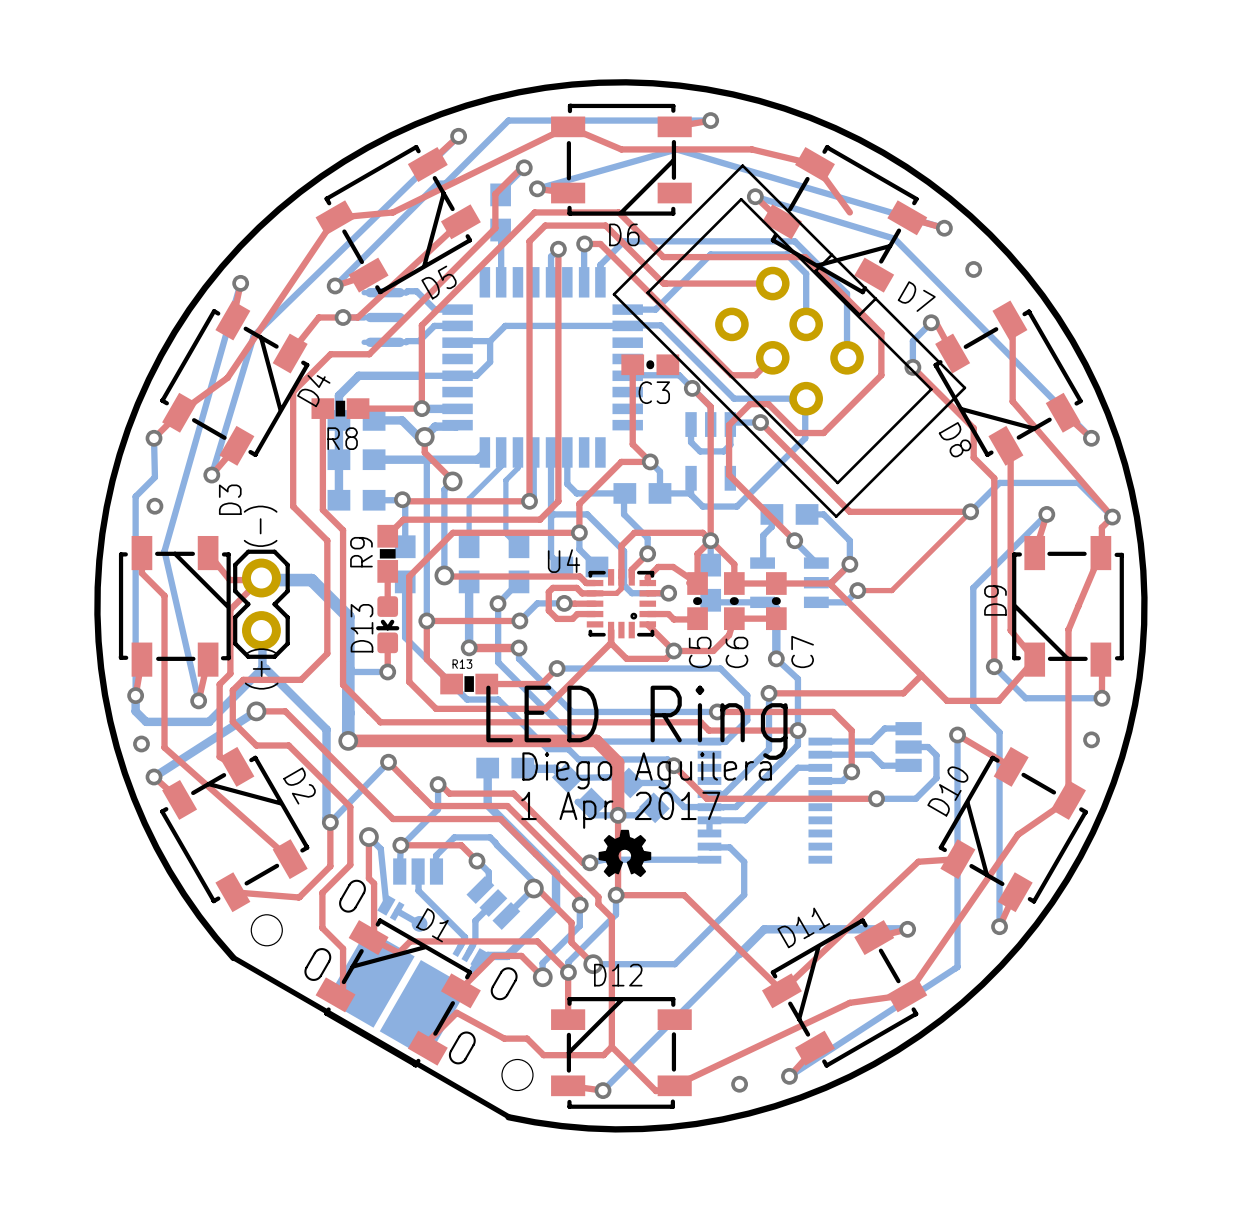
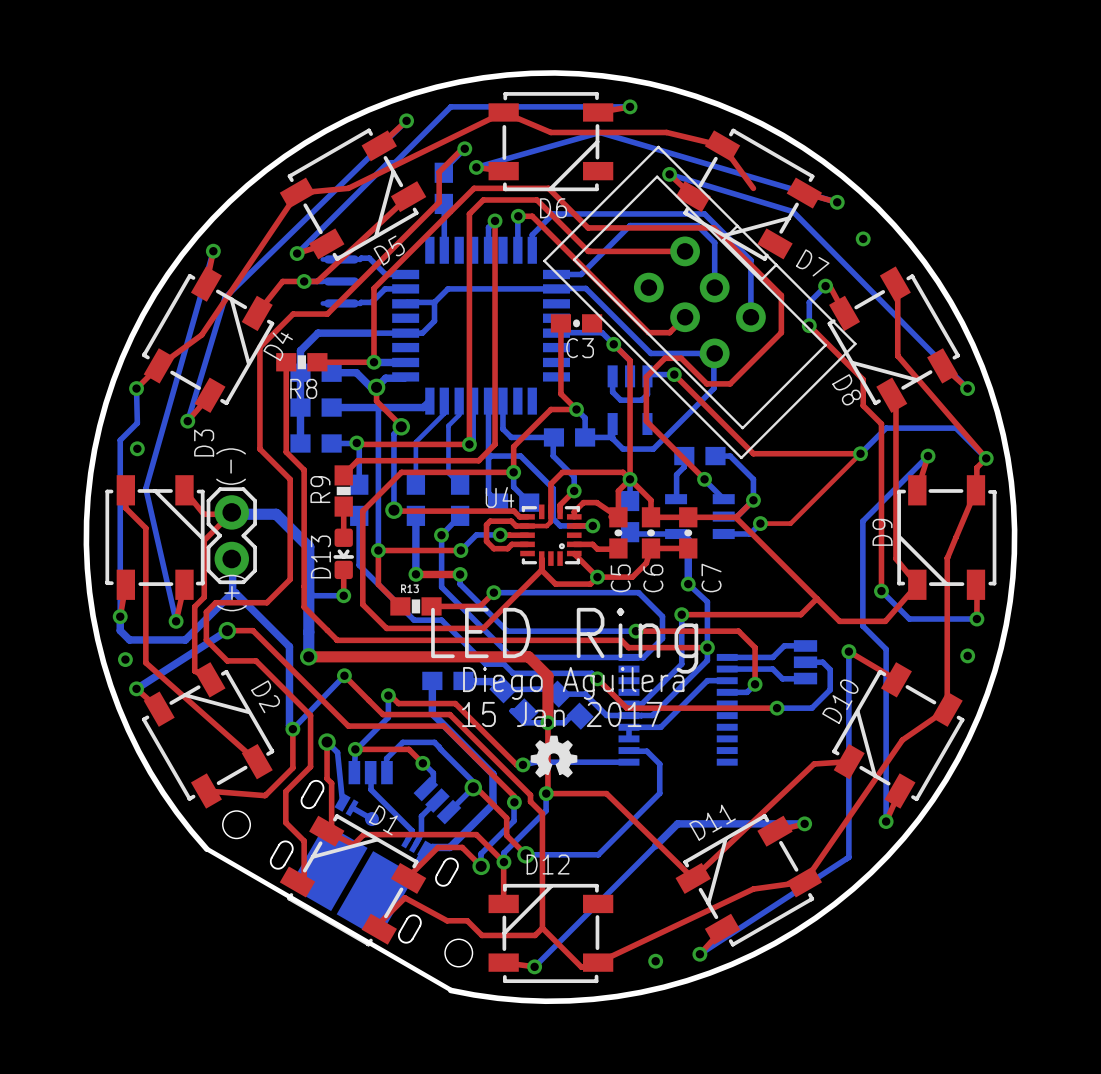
text: 1 Apr 2017 (620, 810) -> 15 Jan 2017 (562, 714)

